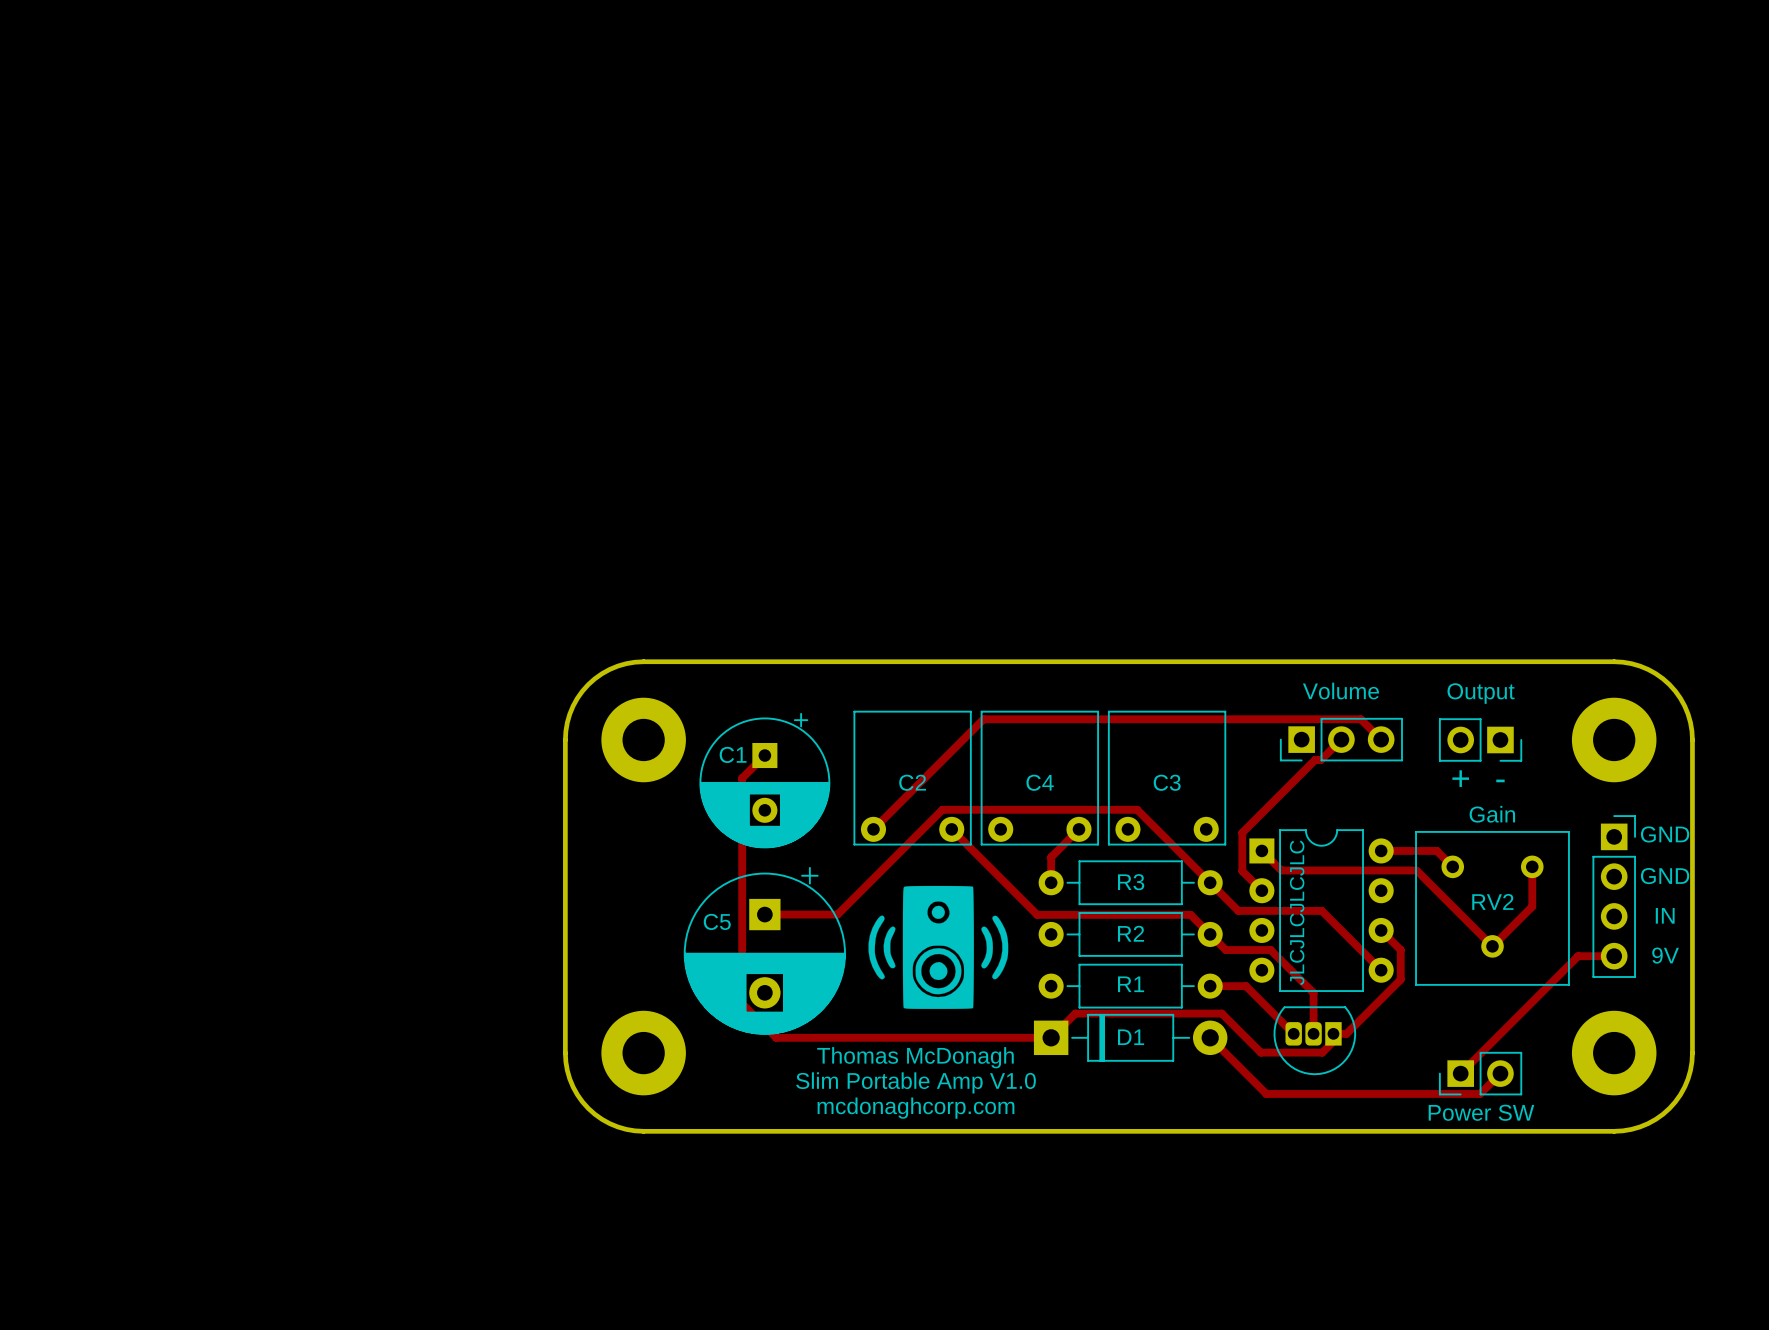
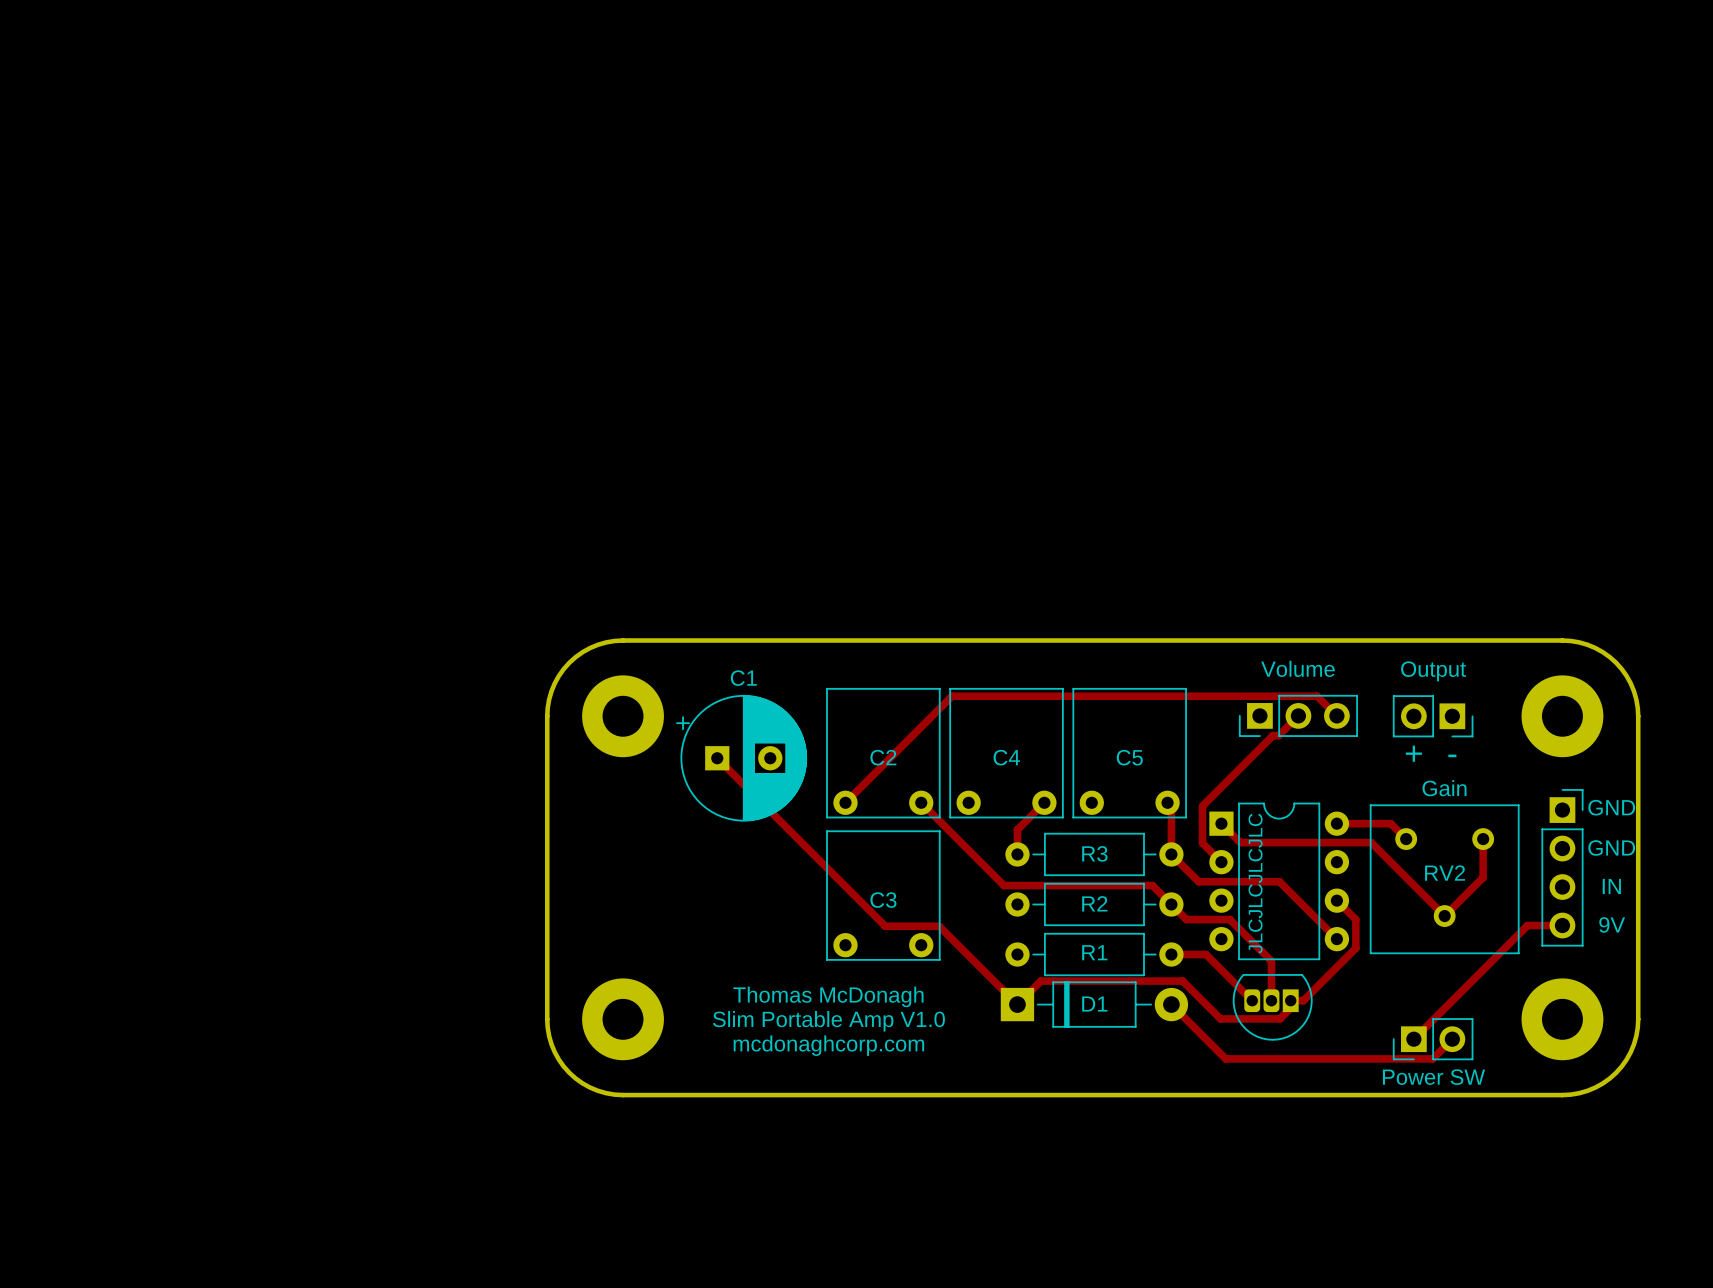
C1 name position: C1 (733, 754) -> C1 (743, 678)
track: (764, 755) (742, 778) (742, 1003) (776, 1037) (1051, 1037) -> (717, 758) (885, 926) (939, 926) (1017, 1004)
C1 rotation: 0° (764, 780) -> 90° counterclockwise (741, 758)
C3 name: C3 (1167, 782) -> C5 (1129, 757)
track: (1210, 882) (1137, 809) (942, 809) (837, 914) (764, 914) -> (1171, 854) (1171, 806) (1167, 802)
drawing: [868, 885, 1009, 1009] -> none
C3: none -> (883, 895)
C5: (764, 950) -> none
text position: Thomas McDonagh (915, 1057) -> Thomas McDonagh (828, 996)
text position: Slim Portable Amp V1.0 (916, 1082) -> Slim Portable Amp V1.0 (828, 1021)
text position: mcdonaghcorp.com (915, 1108) -> mcdonaghcorp.com (828, 1045)

